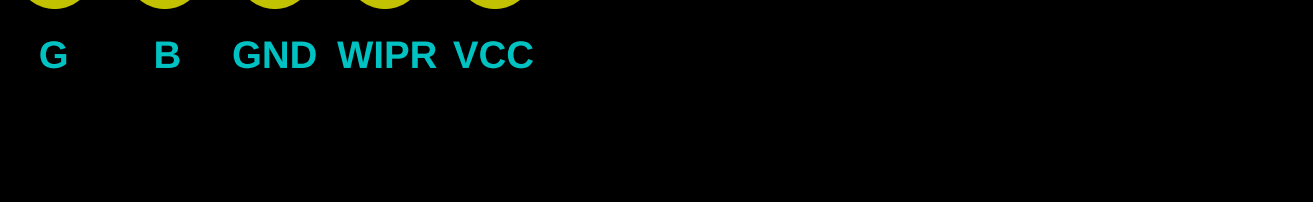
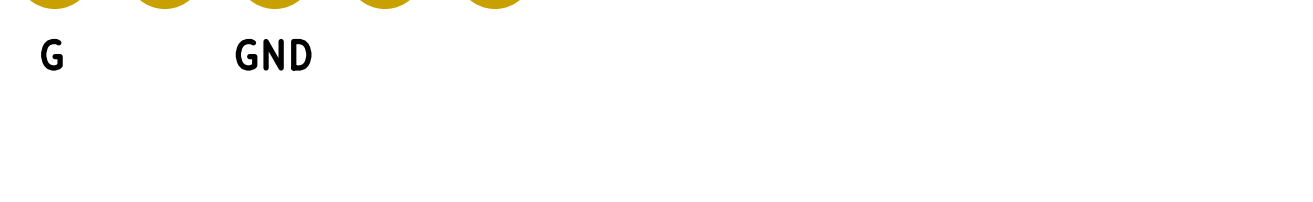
text: B (167, 54) -> none
text: WIPR (386, 54) -> none
text: VCC (493, 54) -> none

